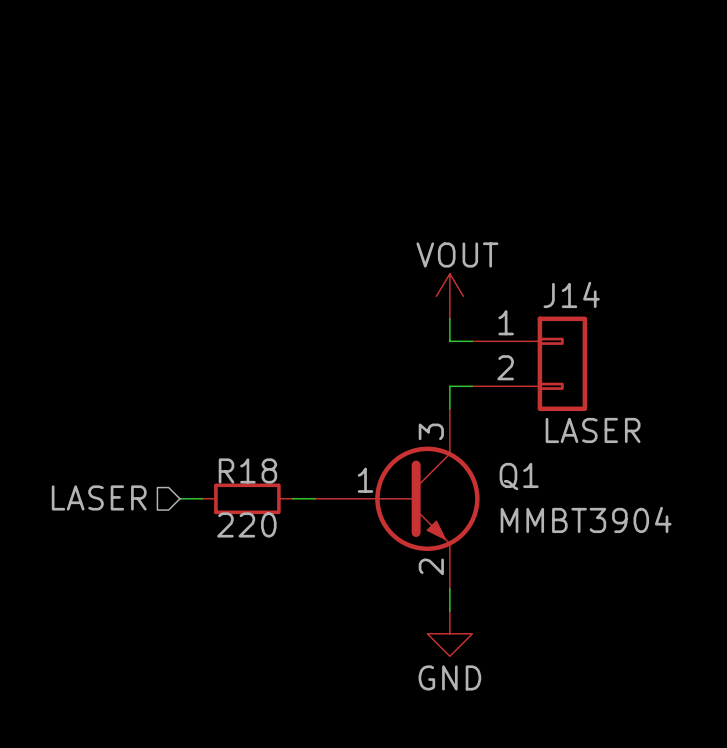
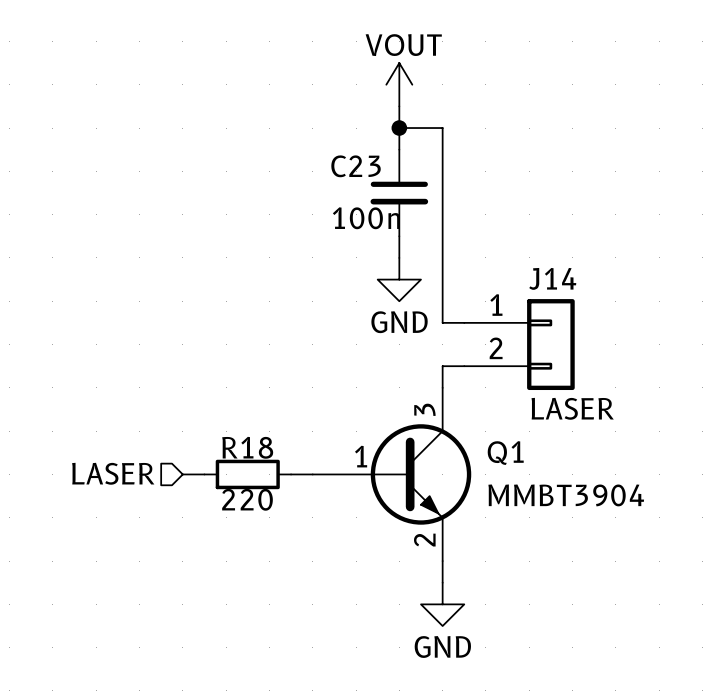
wire: none -> (399, 106) (399, 149)
wire: none -> (399, 128) (442, 128) (442, 301)
junction: none -> (399, 128)
C23: none -> 100n (399, 192)
wire: none -> (399, 236) (399, 257)
power symbol: none -> GND (399, 279)
power symbol position: VOUT (449, 296) -> VOUT (399, 84)

